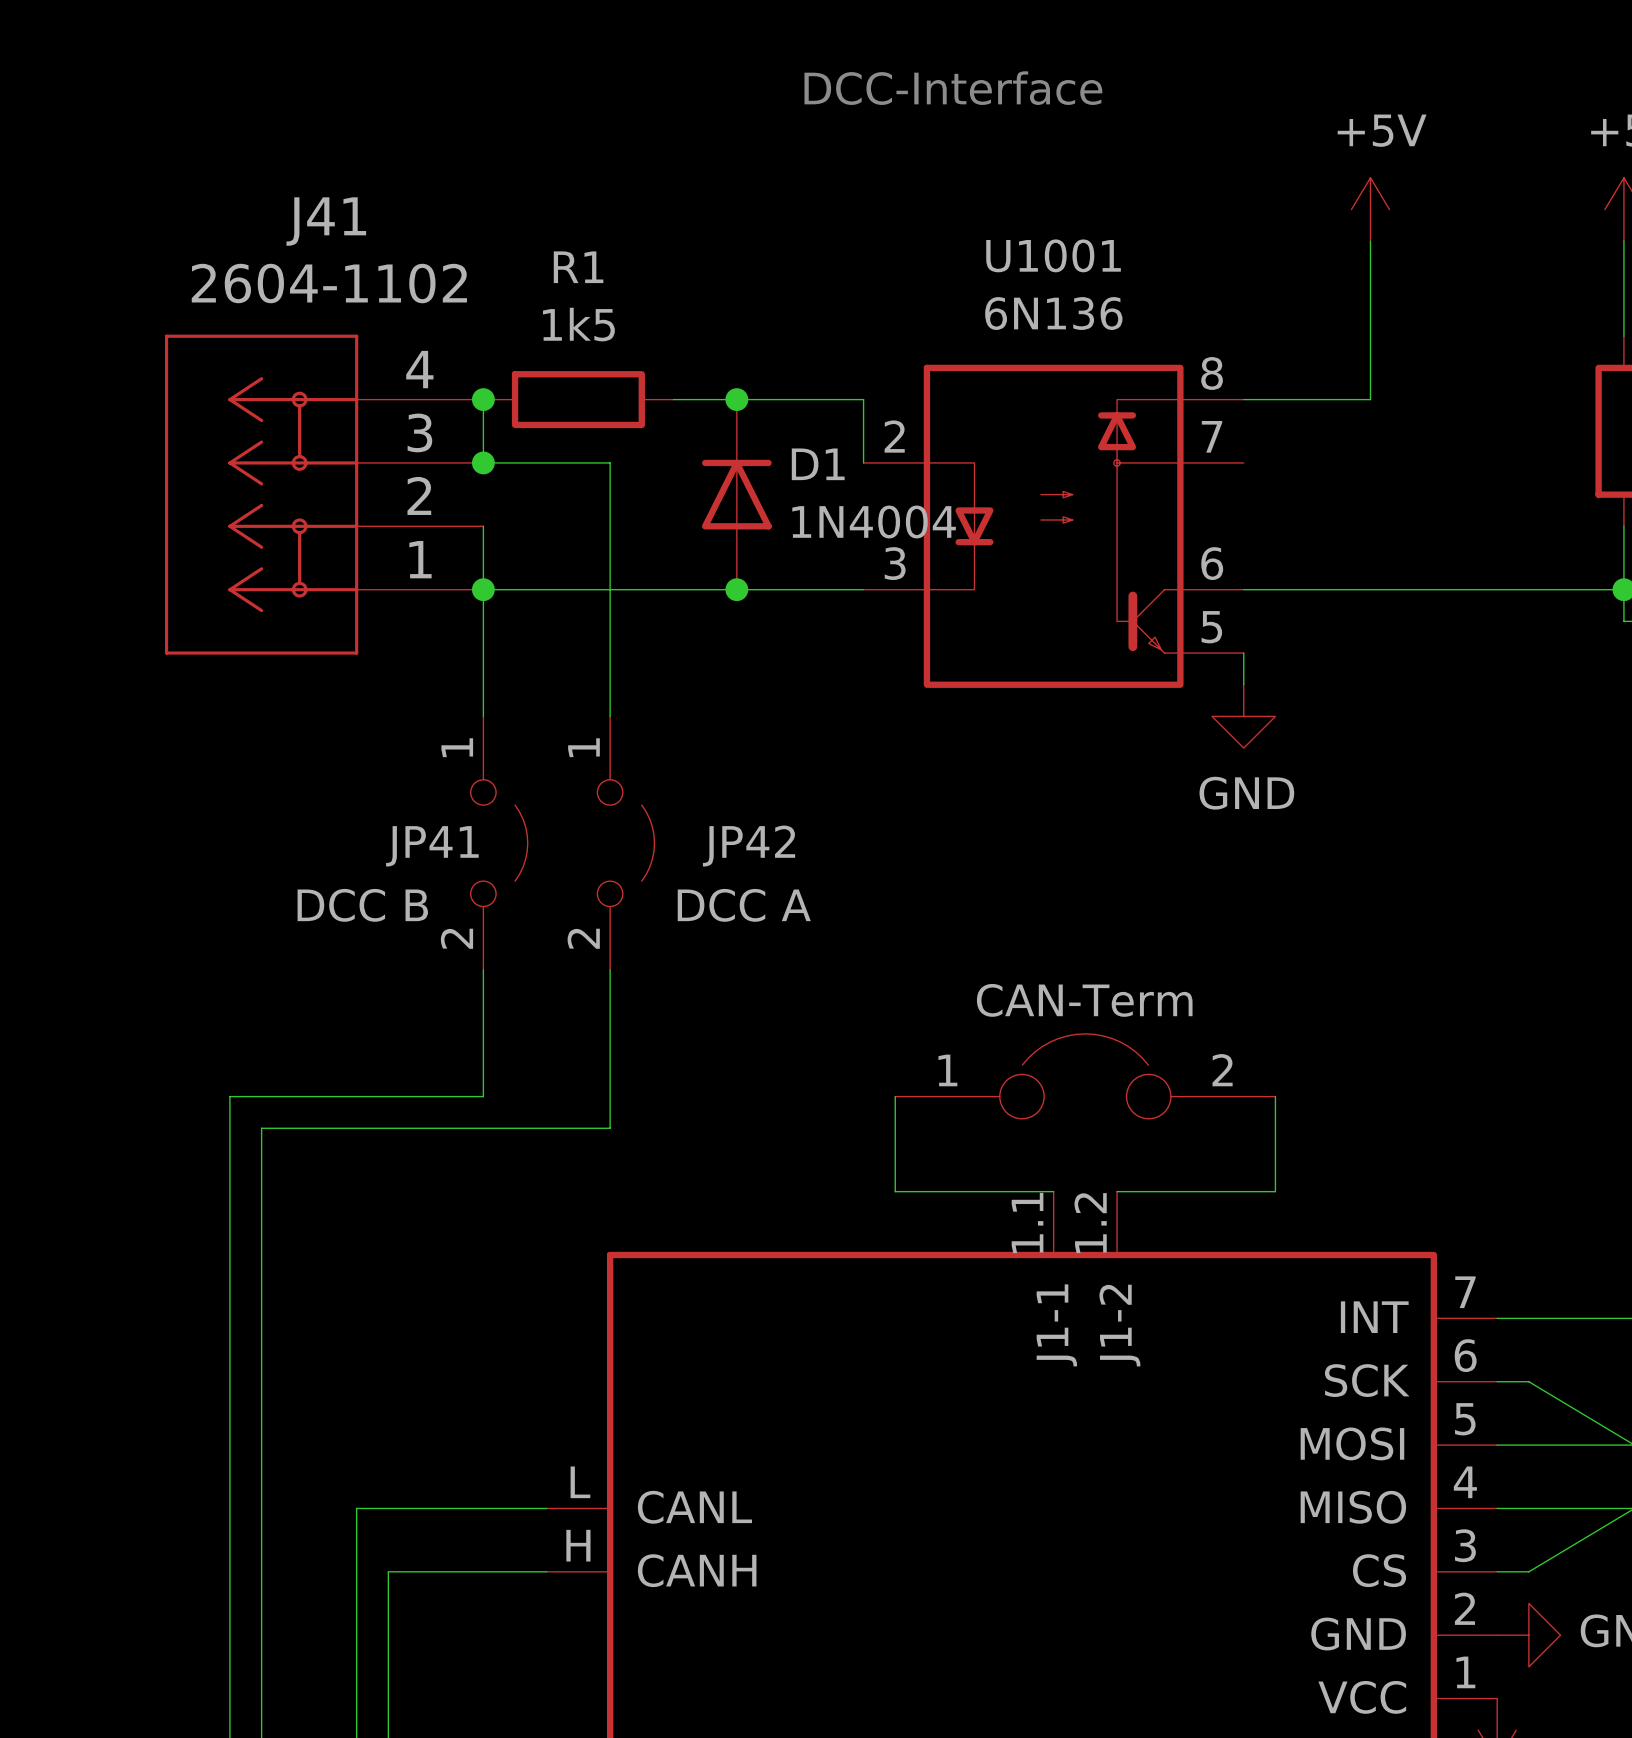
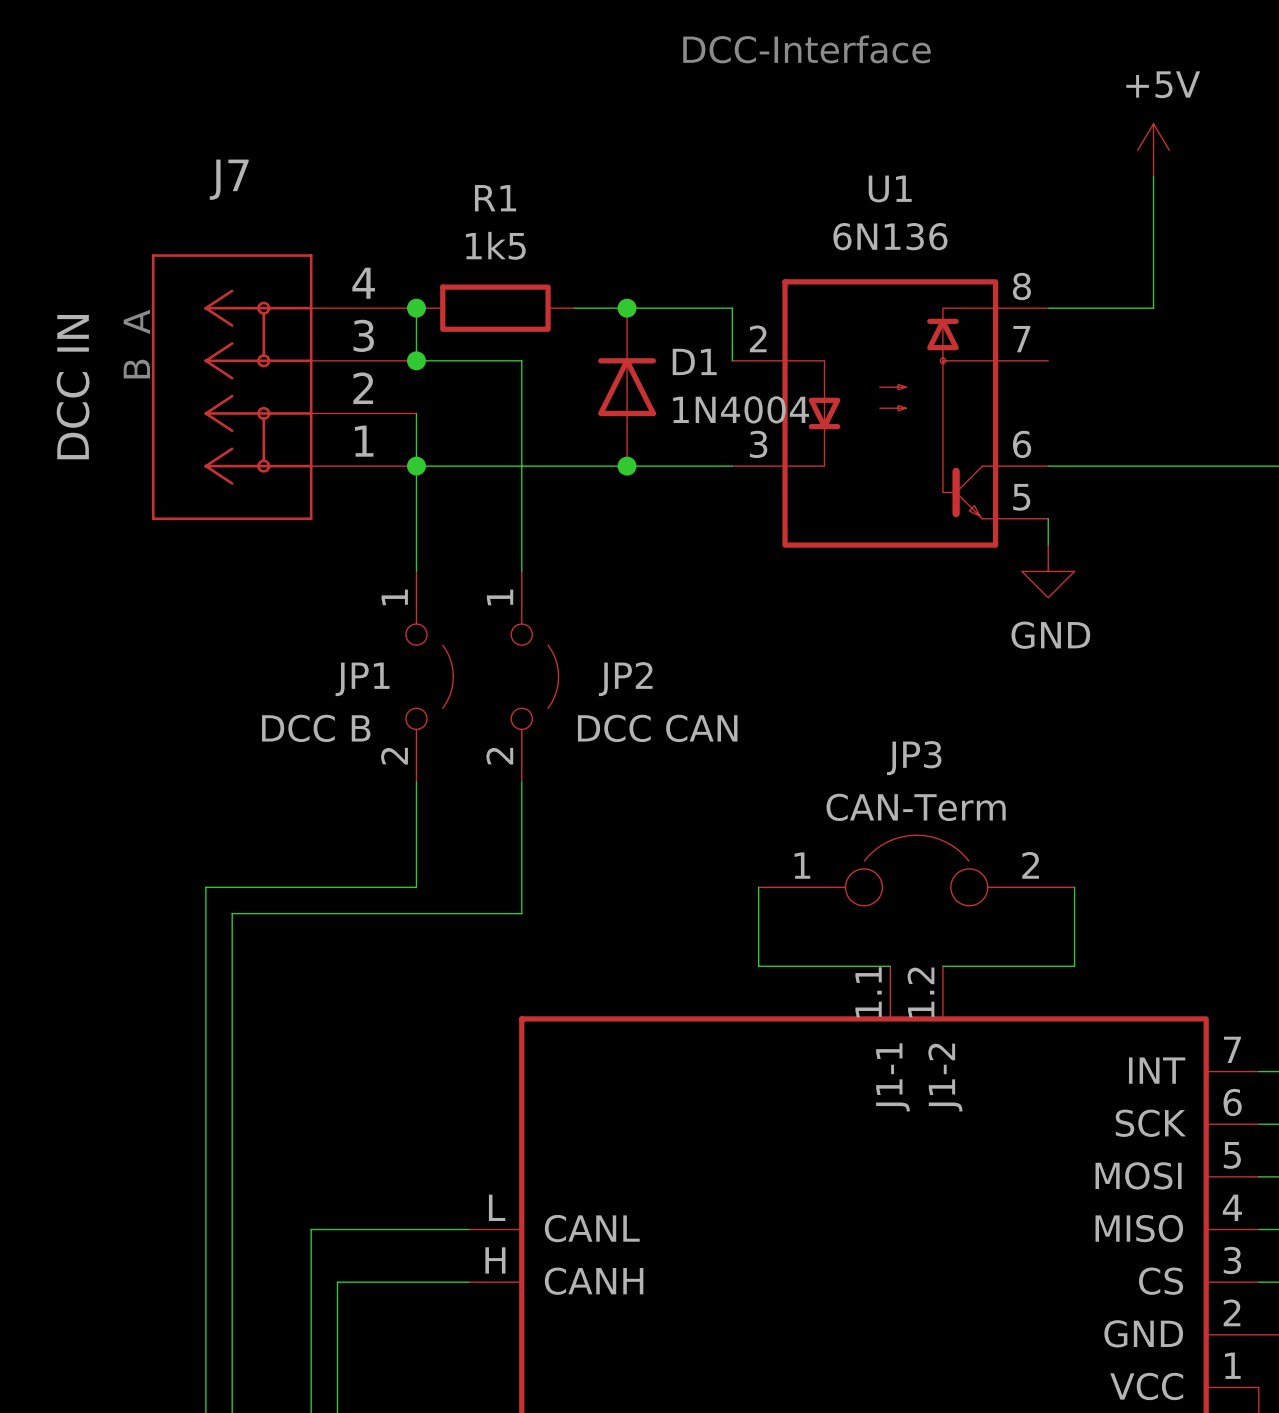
J41 name: J41 (326, 221) -> J7 (229, 179)
U1001 name: U1001 (1053, 255) -> U1 (890, 188)
J41 value: 2604-1102 (329, 283) -> DCC IN (73, 387)
text: none -> B A (136, 344)
JP41 name: JP41 (432, 846) -> JP1 (362, 679)
JP42 name: JP42 (749, 846) -> JP2 (625, 679)
JP42 value: DCC A (744, 905) -> DCC CAN (657, 728)
JP3 name: none -> JP3 (914, 758)

